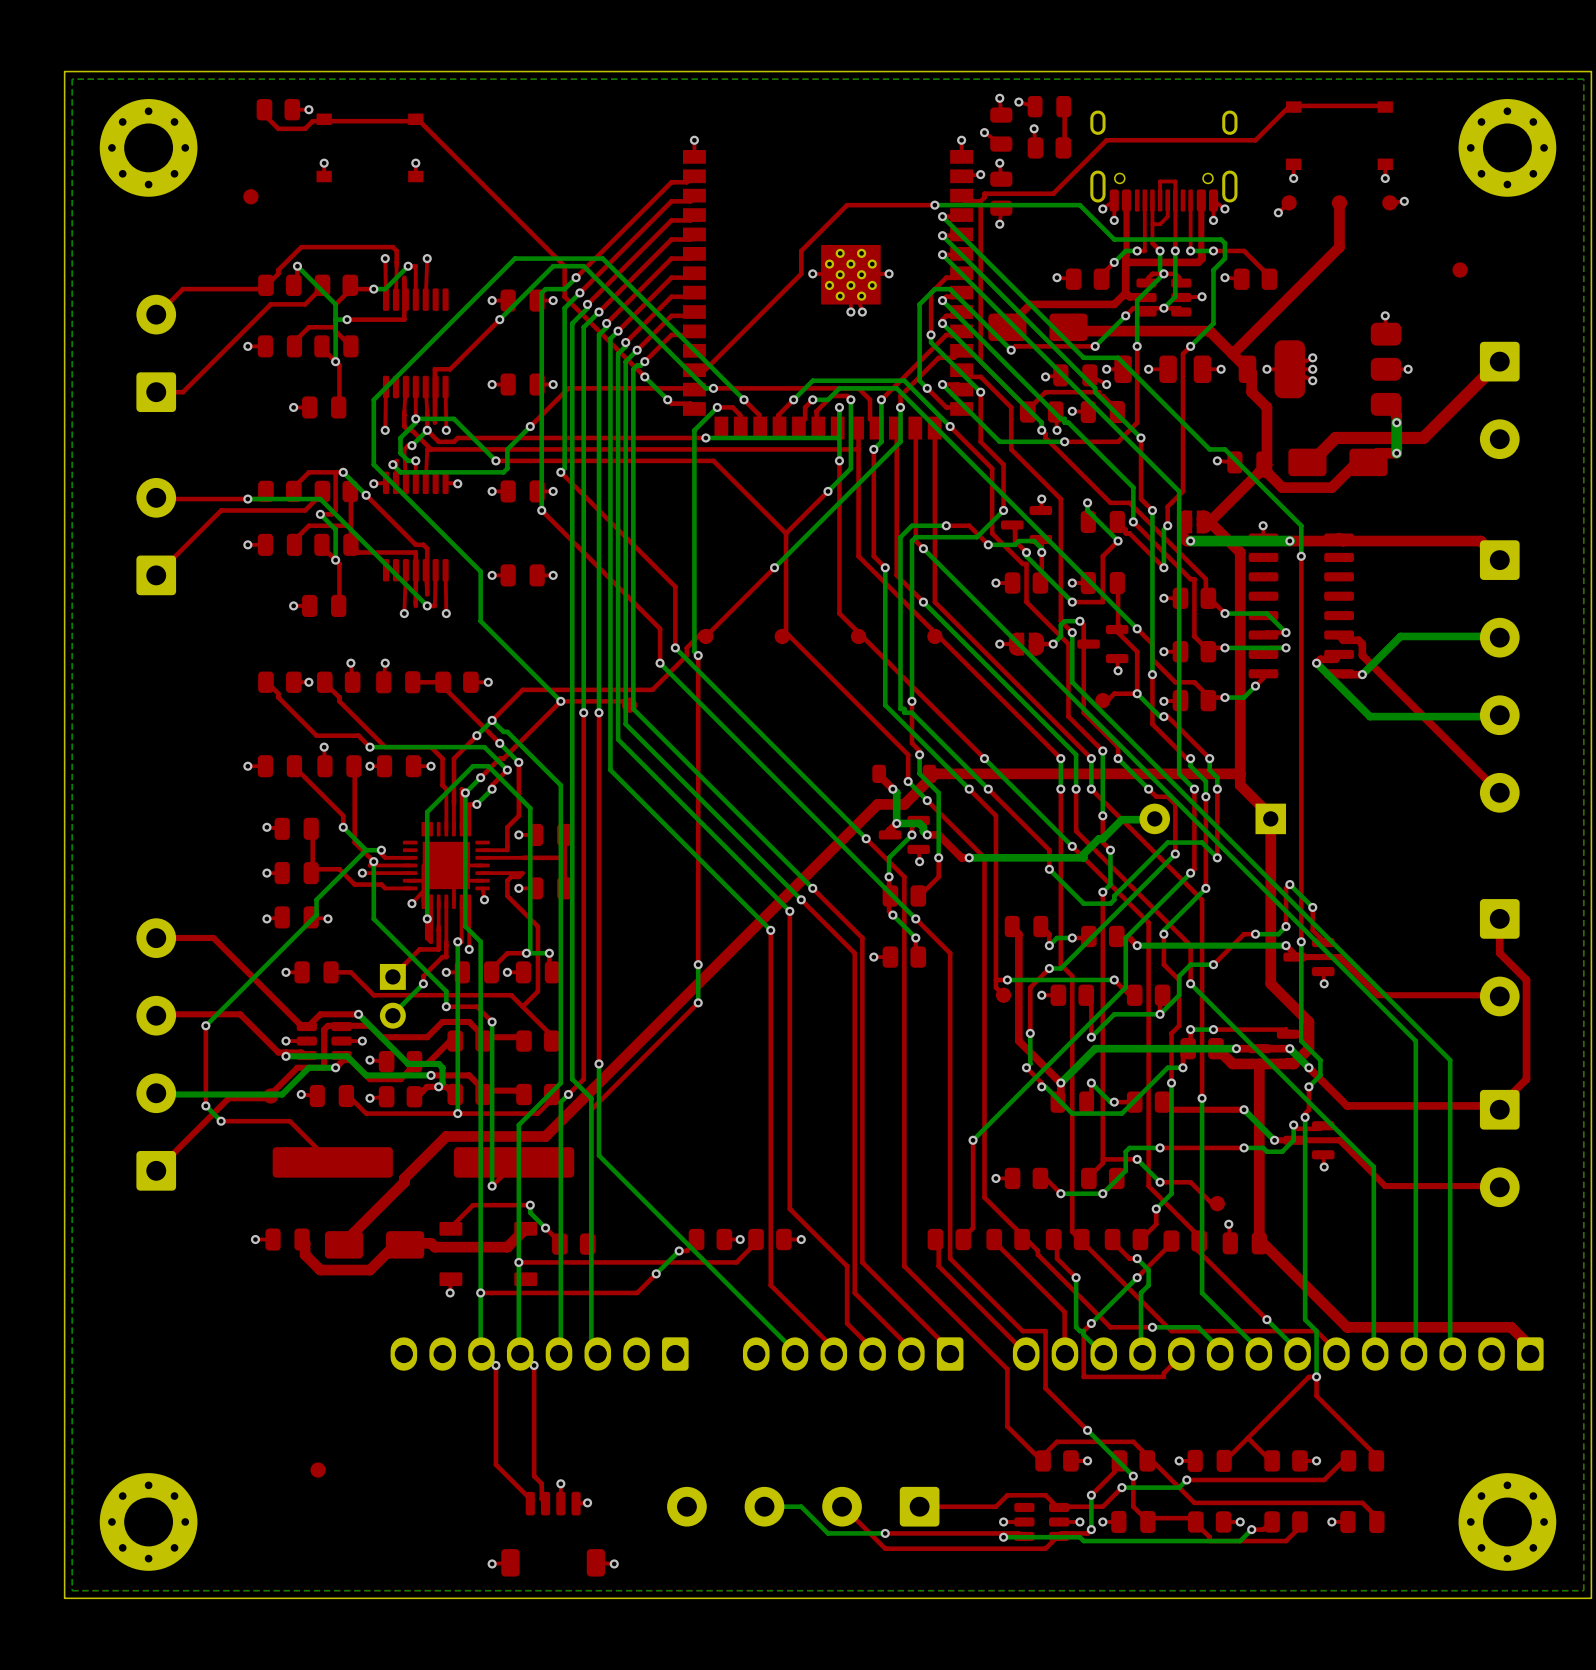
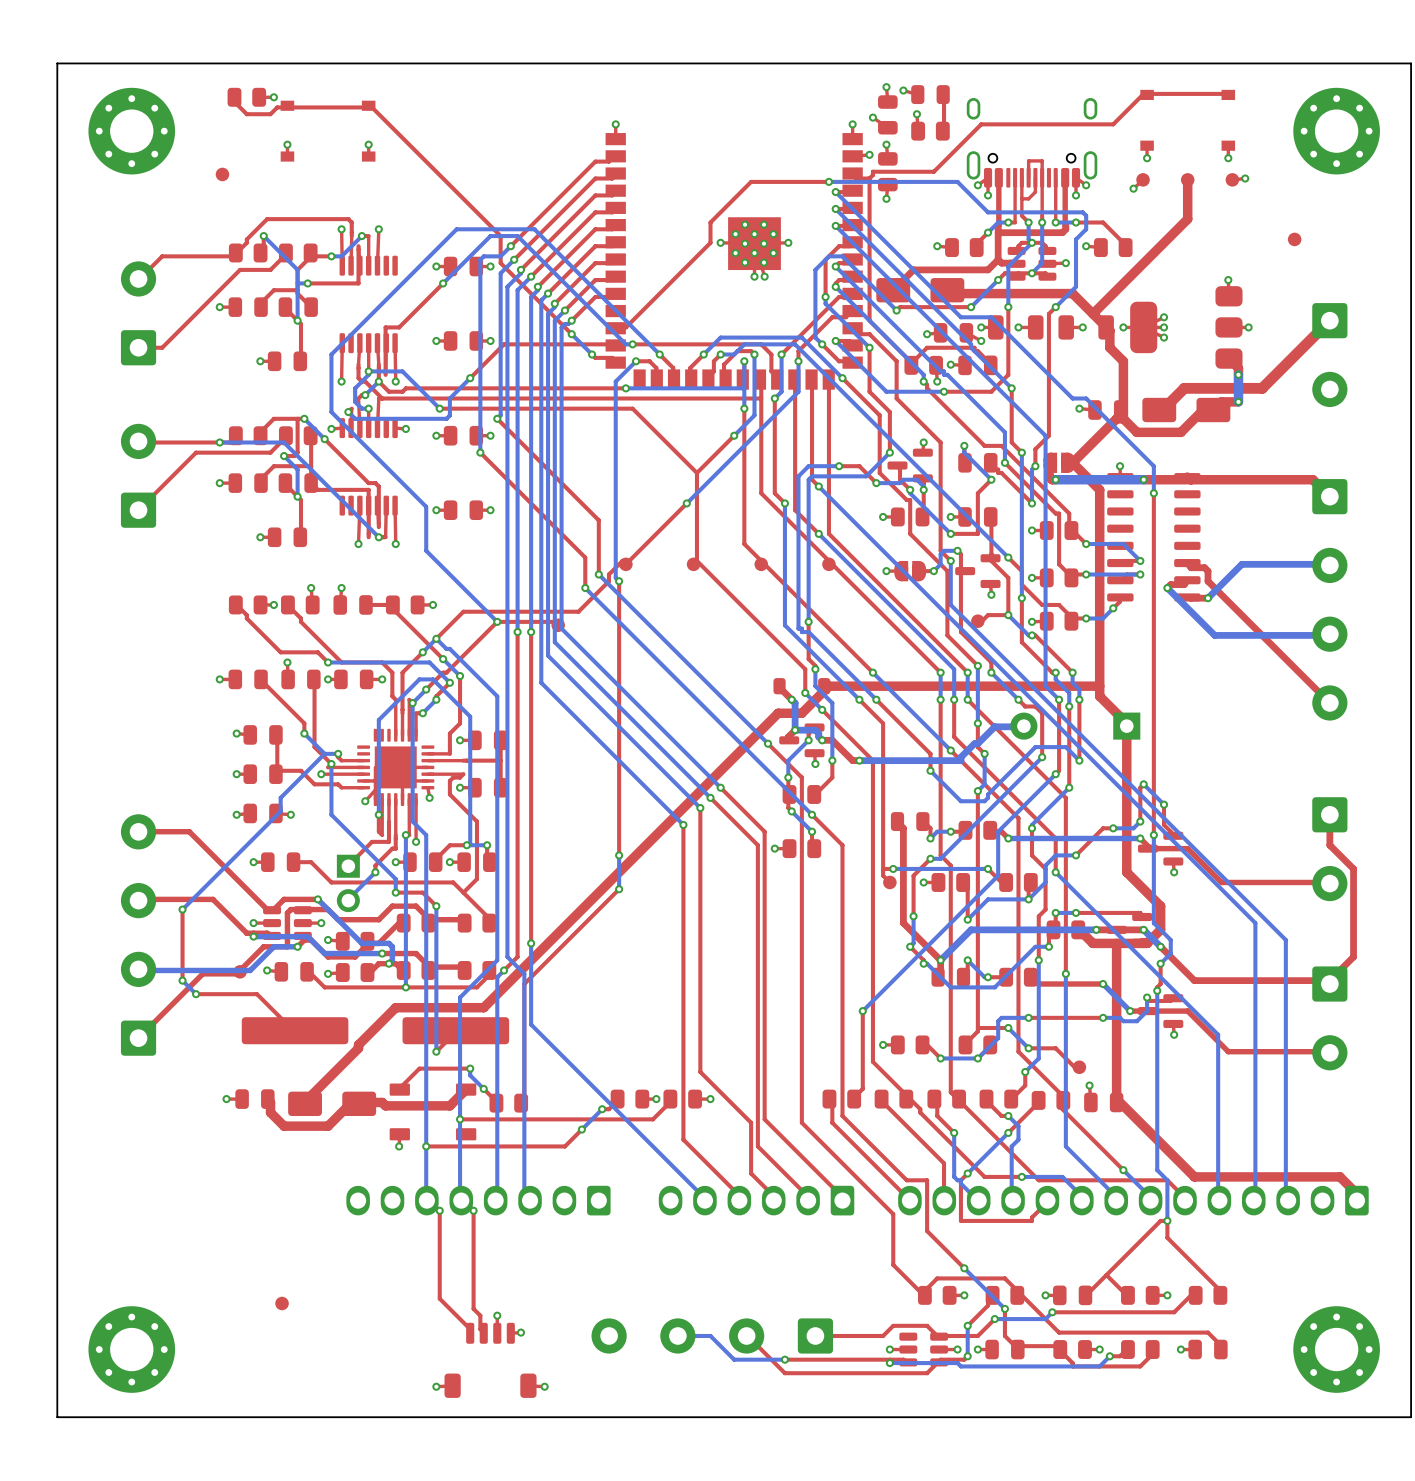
bottom zone outline: (1583, 79) (72, 79) (72, 1590) (1583, 1590) (1583, 79) -> none

